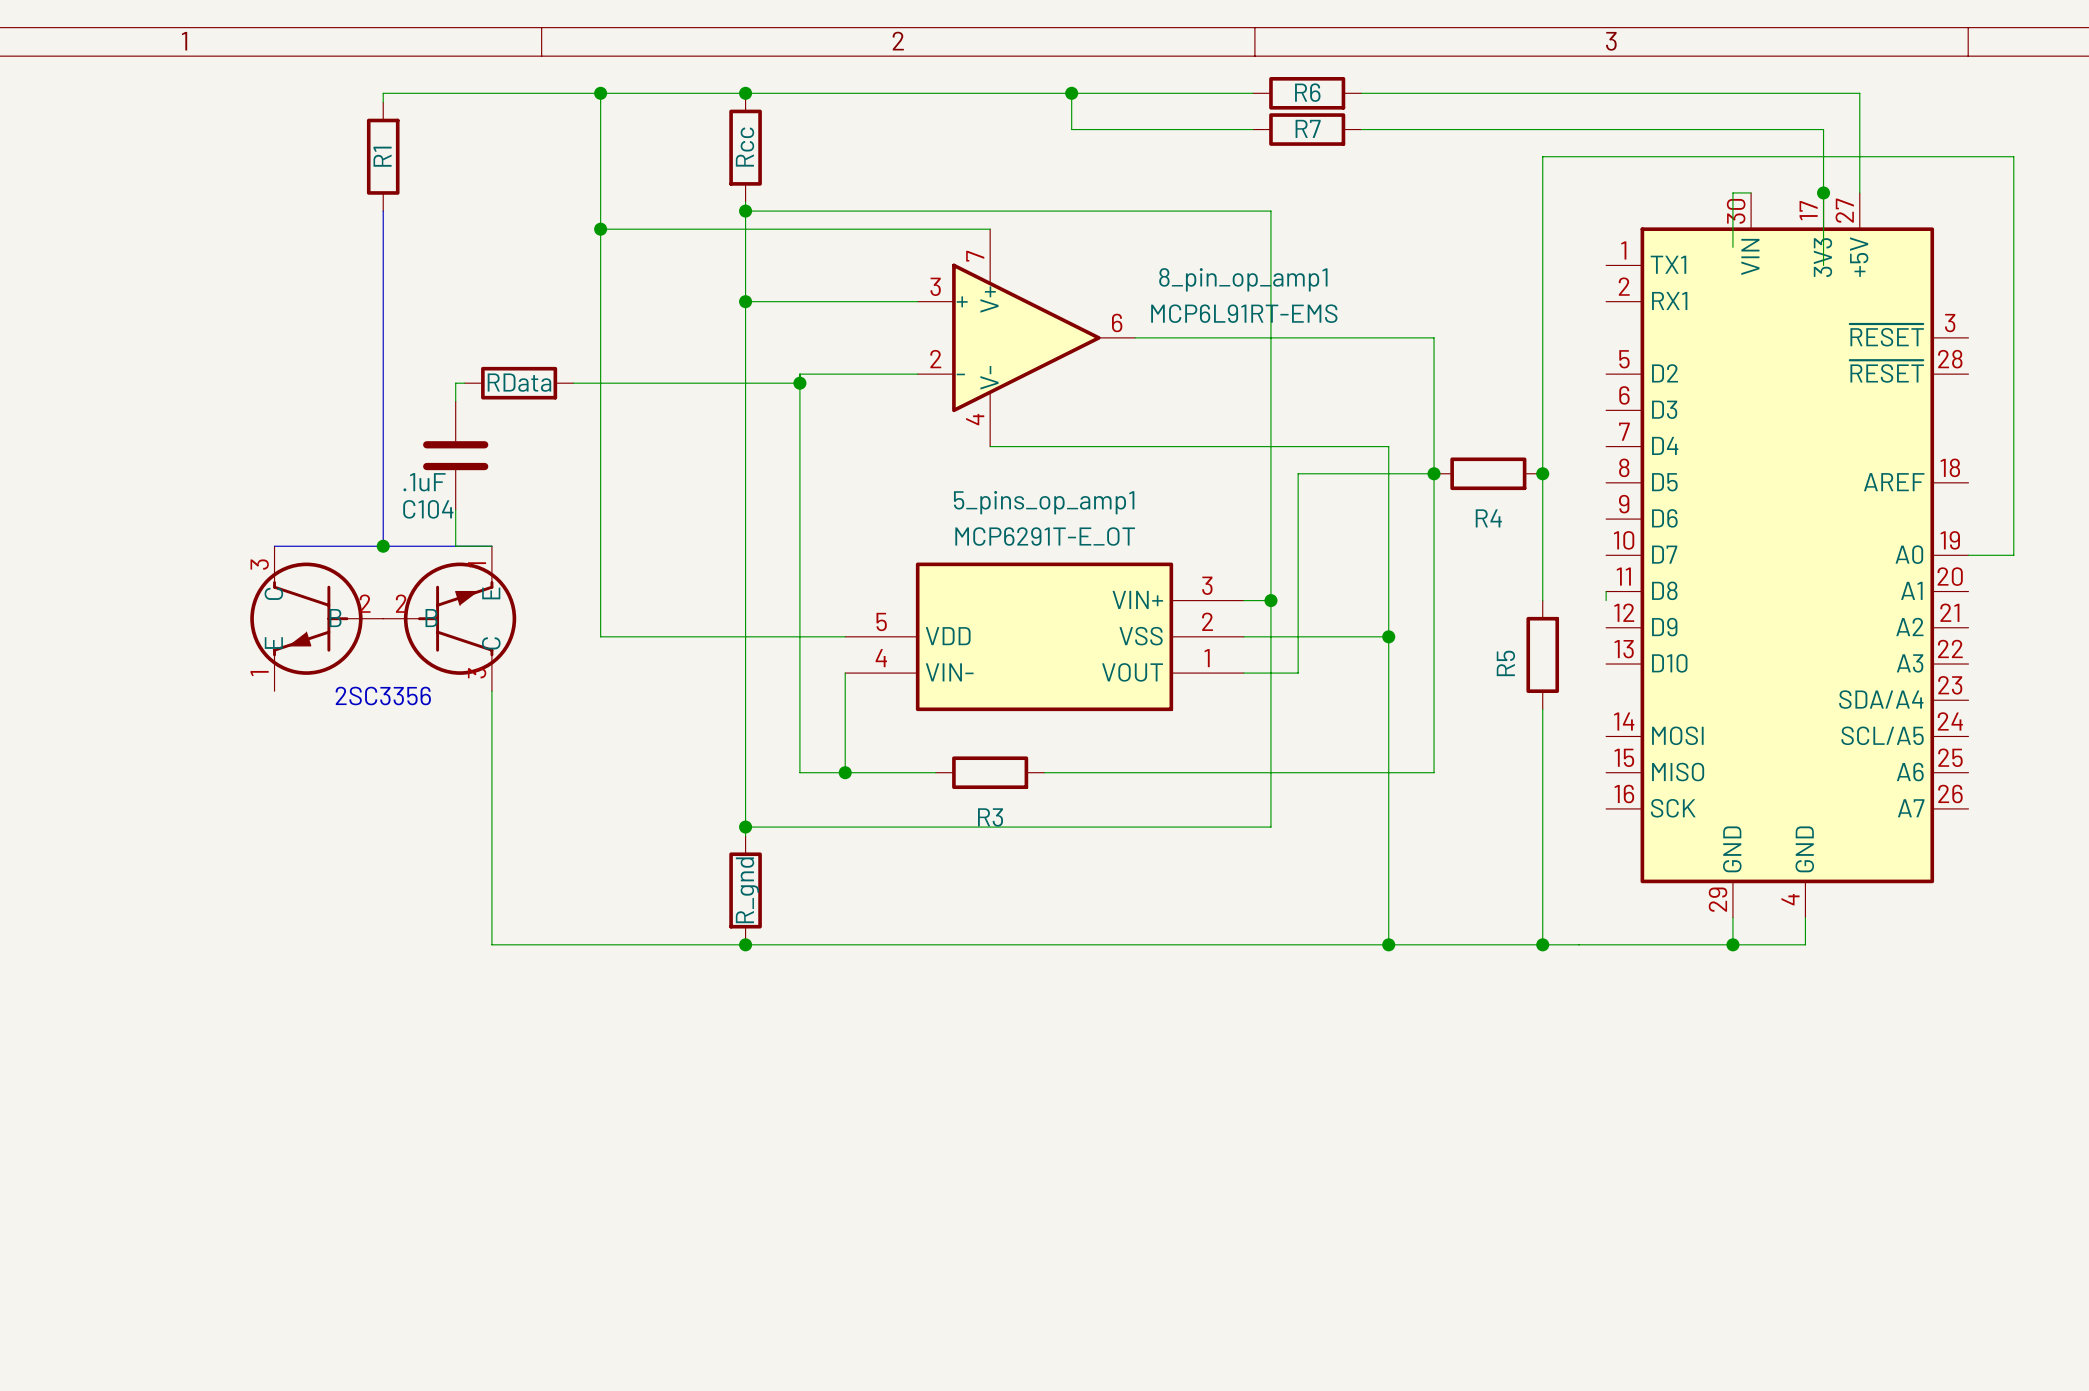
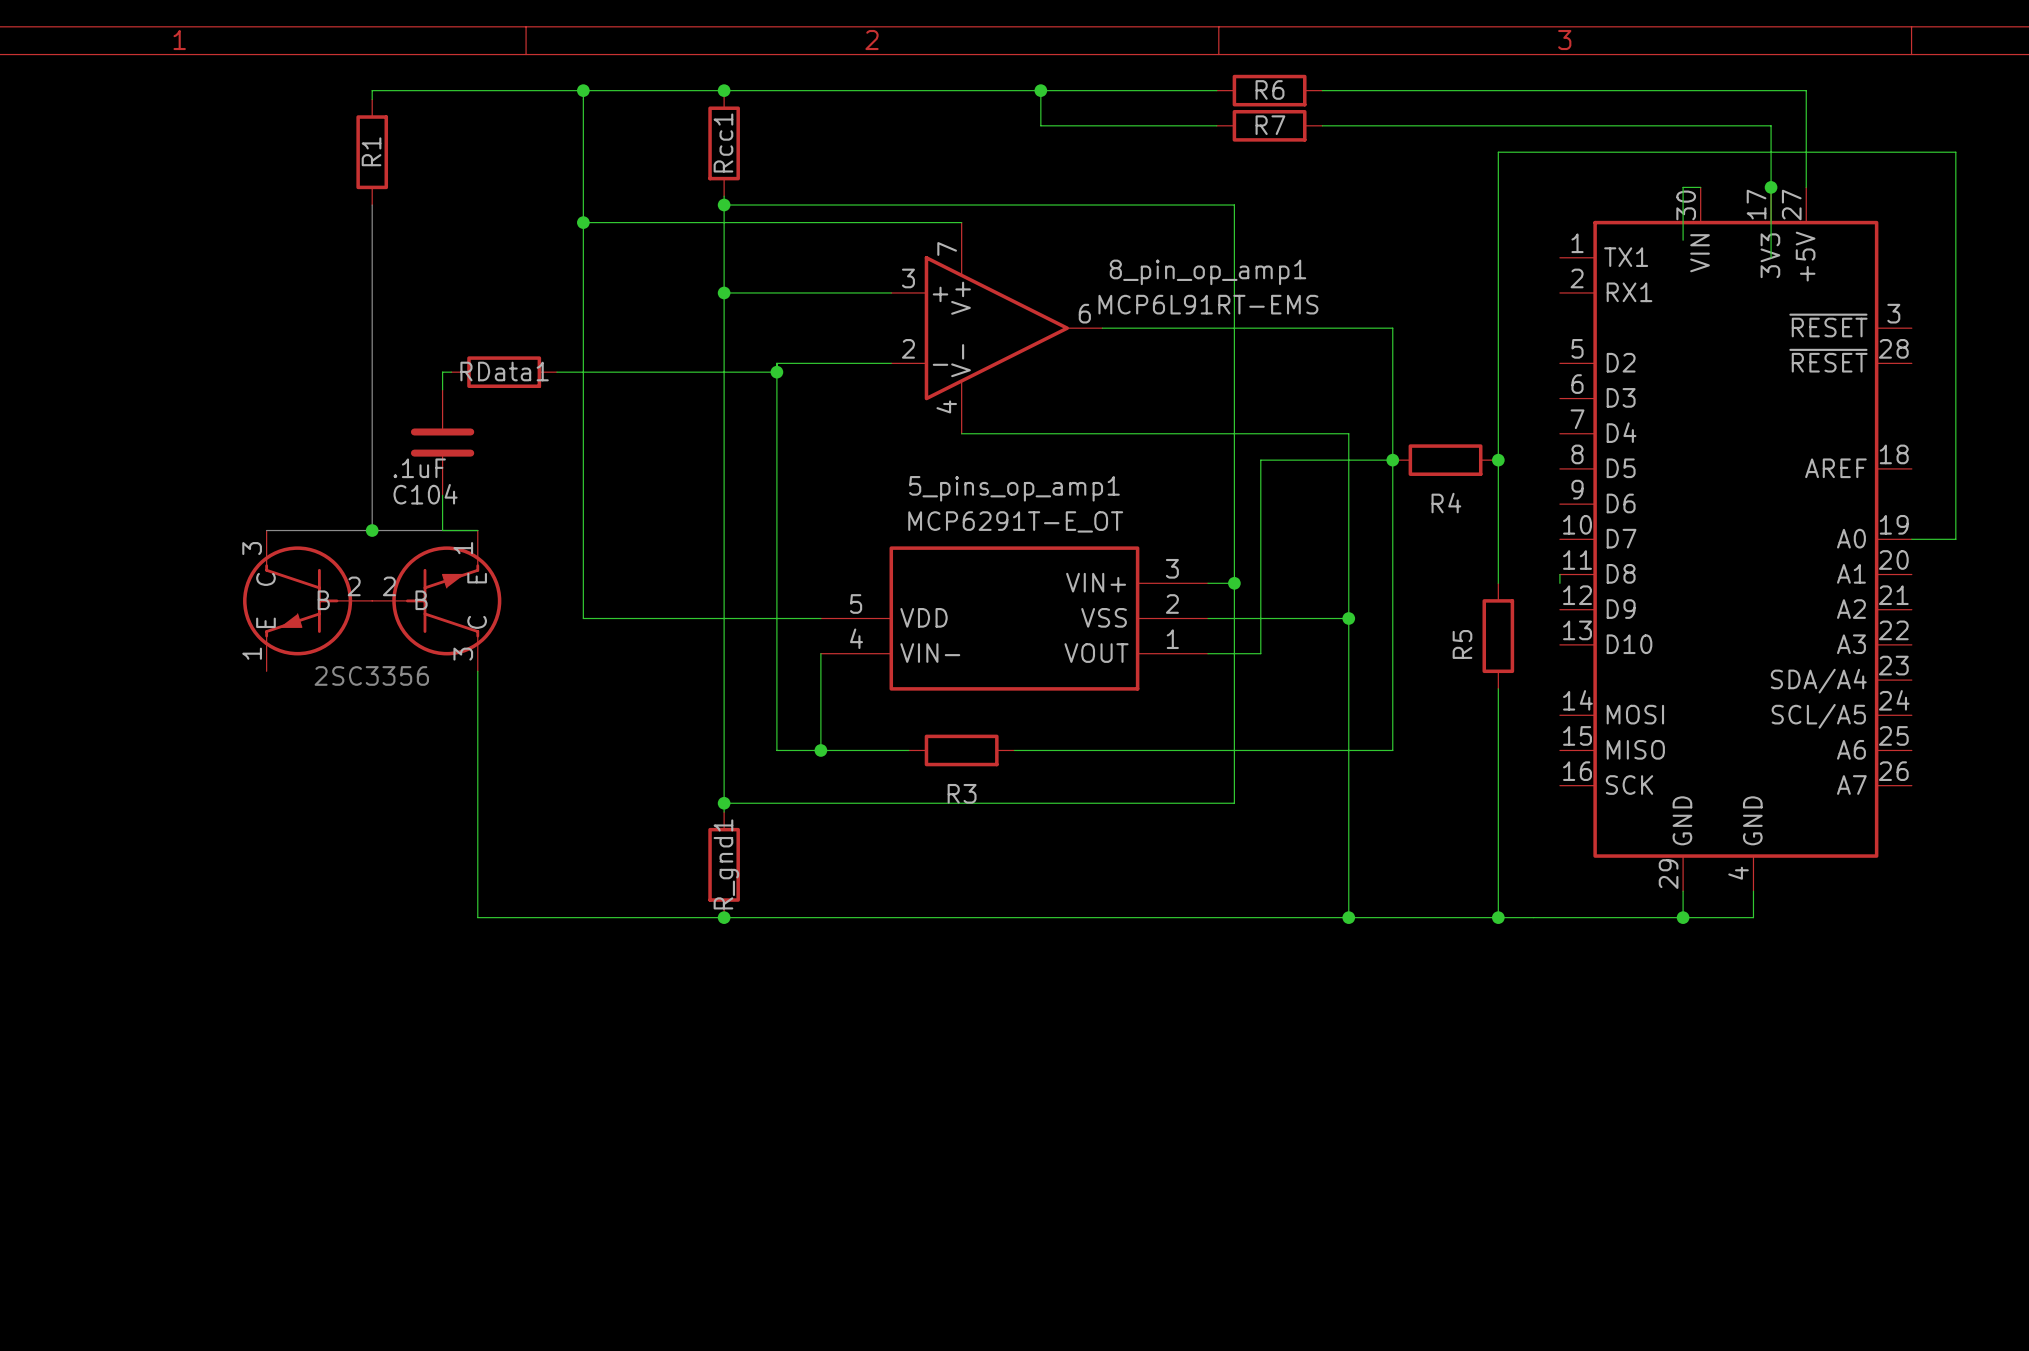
Rcc name: Rcc (745, 147) -> Rcc1 (723, 143)
RData name: RData (519, 382) -> RData1 (504, 371)
R_gnd name: R_gnd (747, 890) -> R_gnd1 (726, 864)

